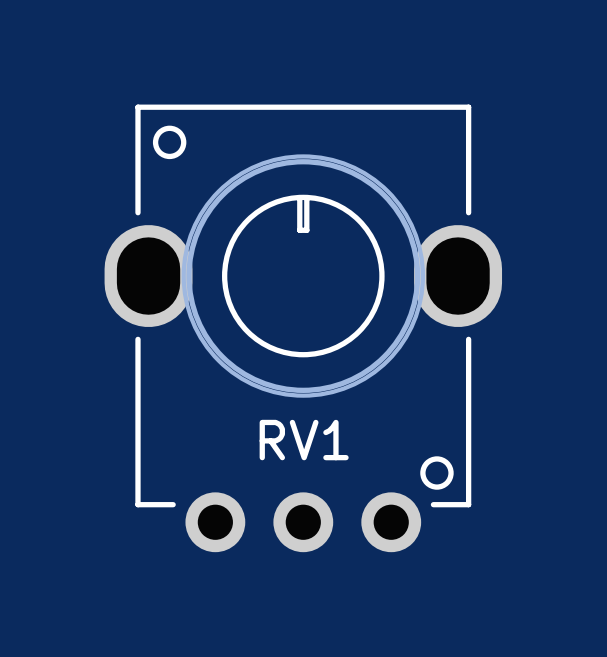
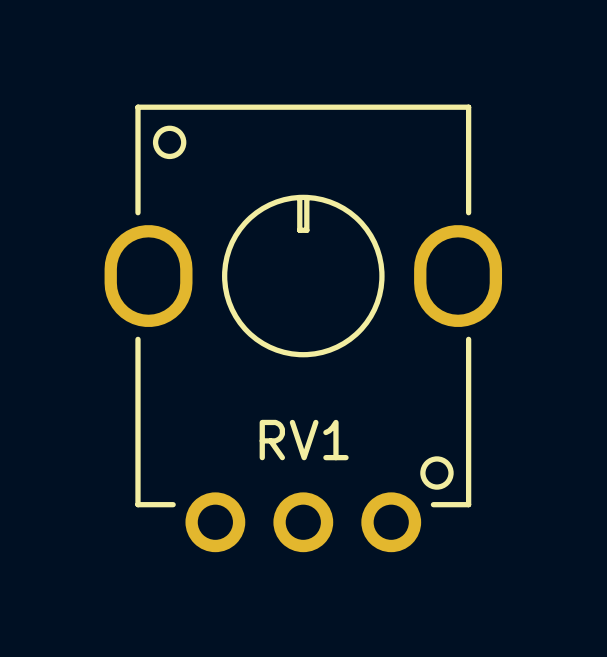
RV1 footprint: [104, 104, 503, 553] -> [104, 104, 503, 553]
drawing: [181, 154, 426, 398] -> none

